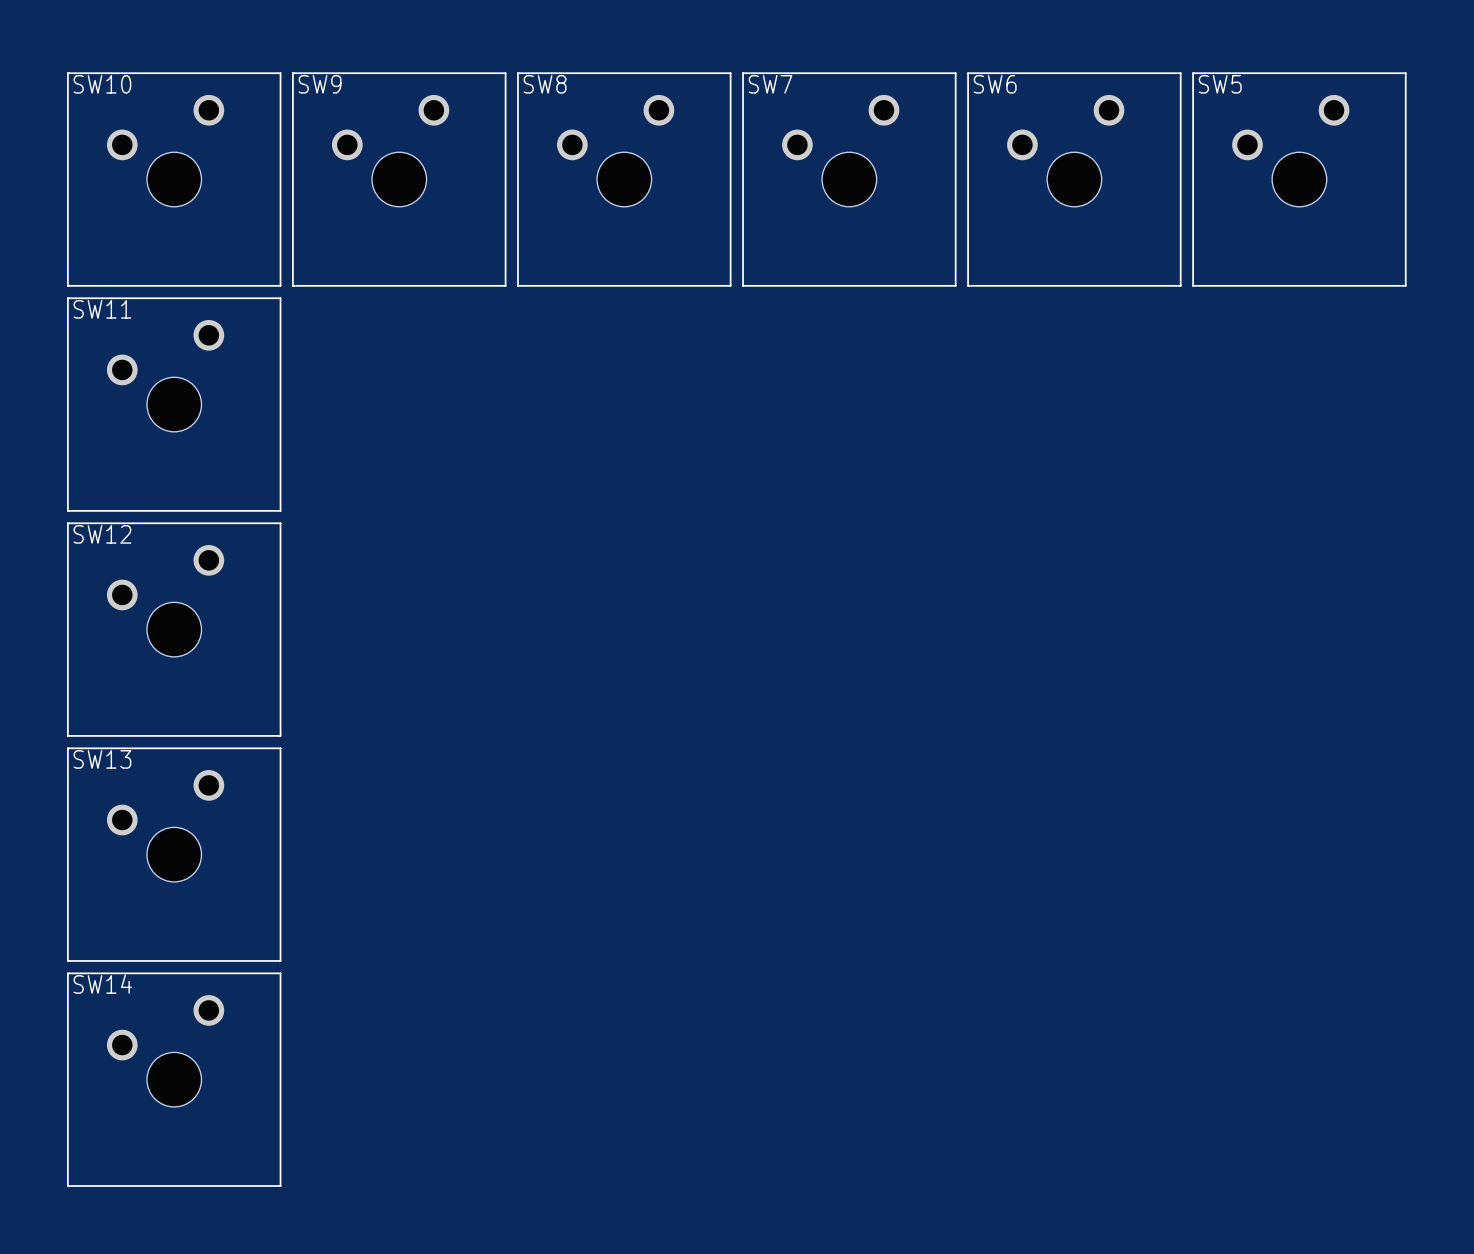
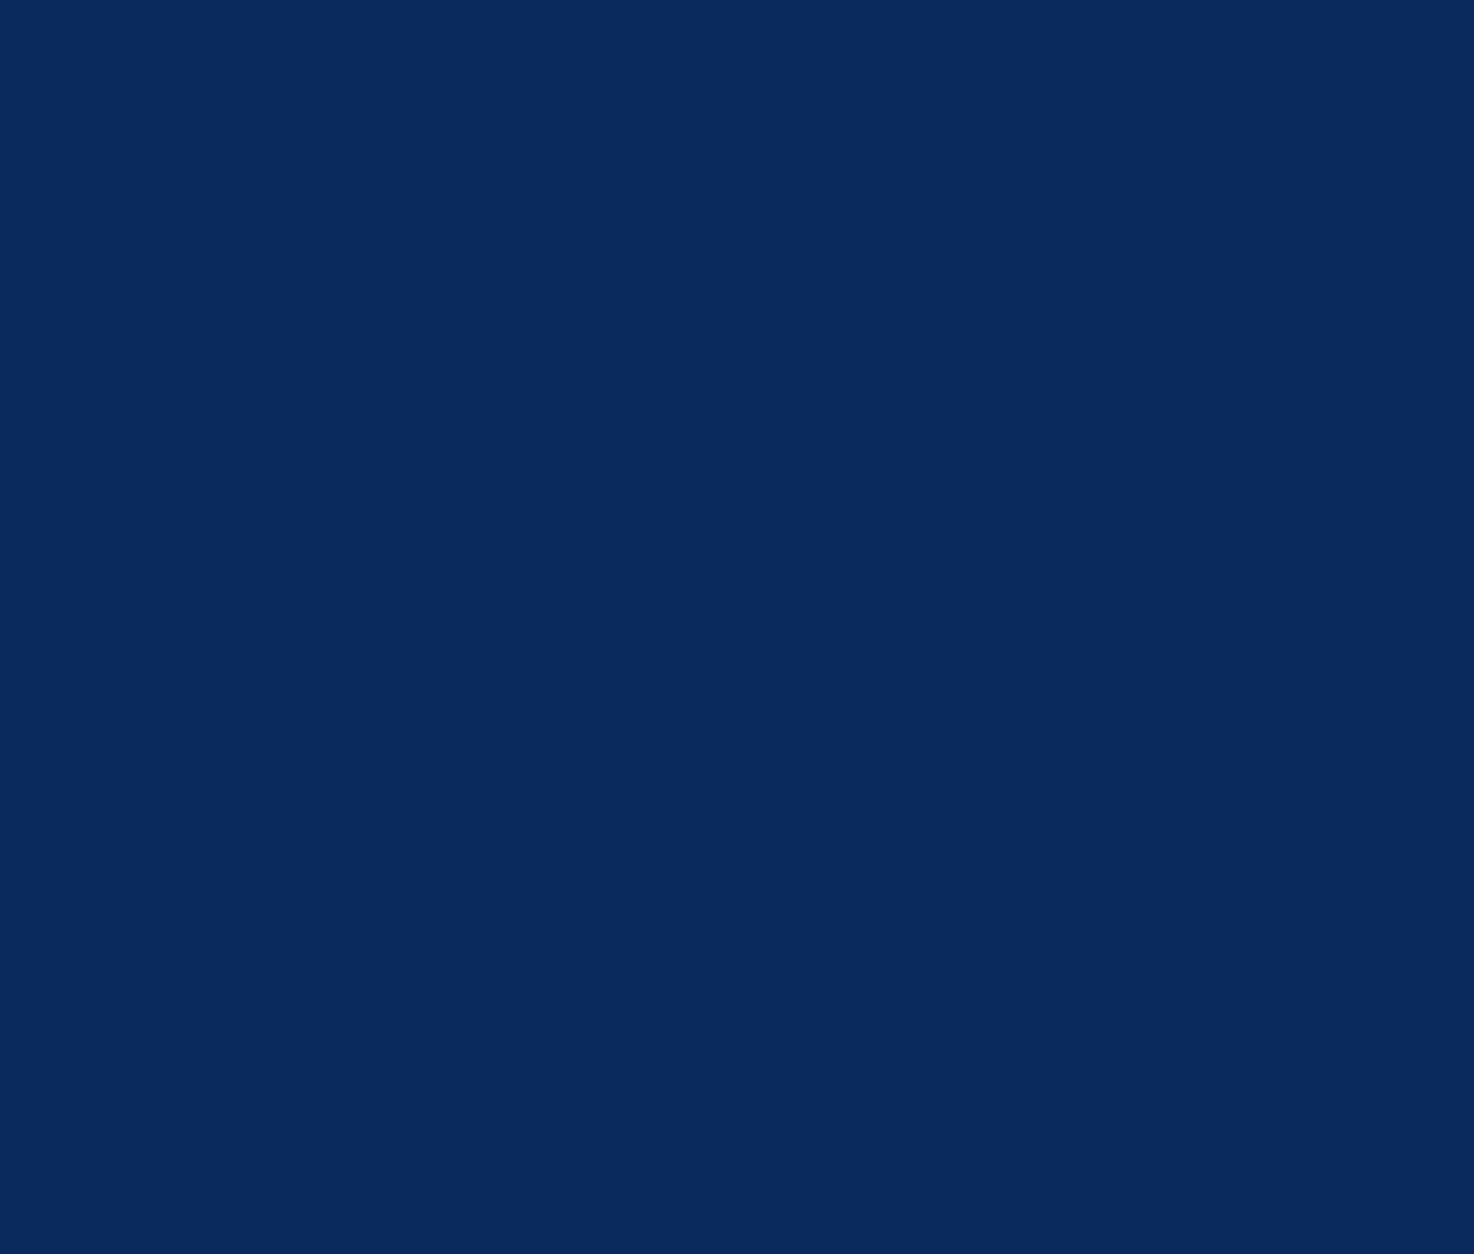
SW10: (174, 179) -> none
SW9: (399, 179) -> none
SW8: (624, 179) -> none
SW7: (849, 179) -> none
SW6: (1074, 179) -> none
SW5: (1299, 179) -> none
SW11: (174, 404) -> none
SW12: (174, 629) -> none
SW13: (174, 854) -> none
SW14: (174, 1079) -> none

